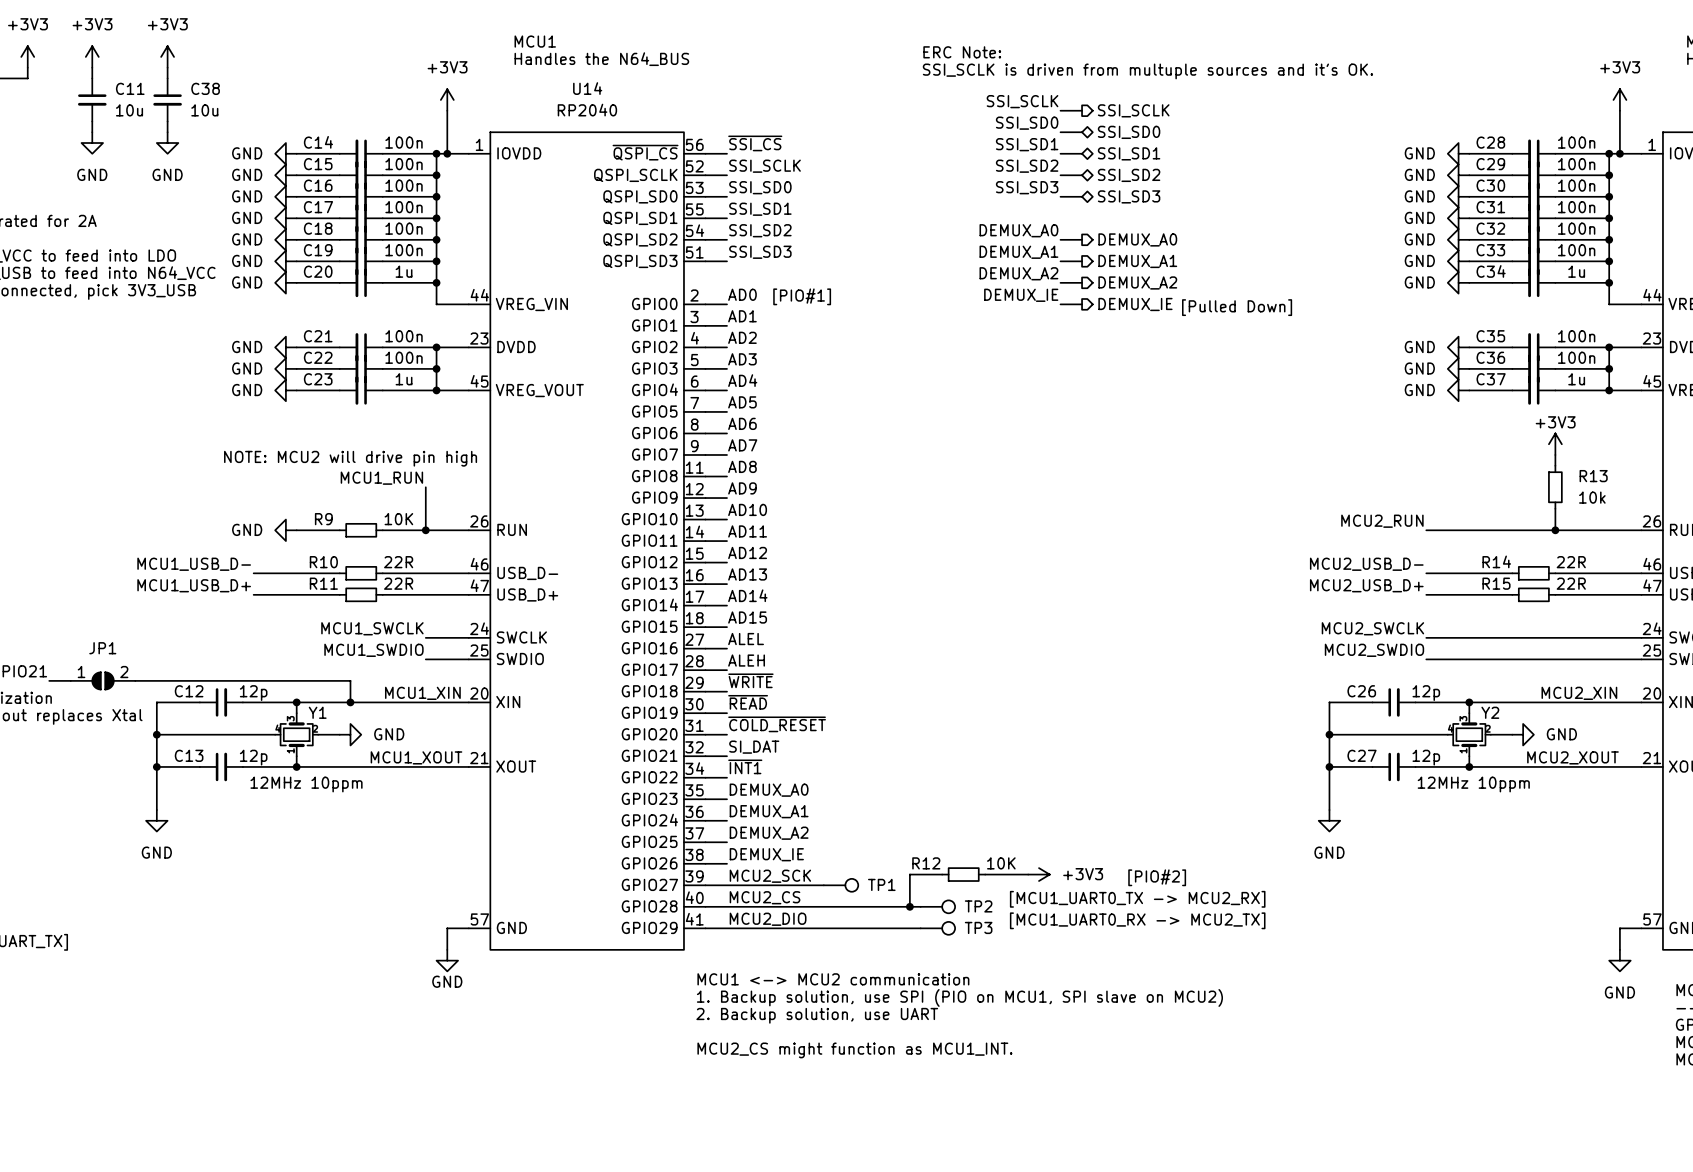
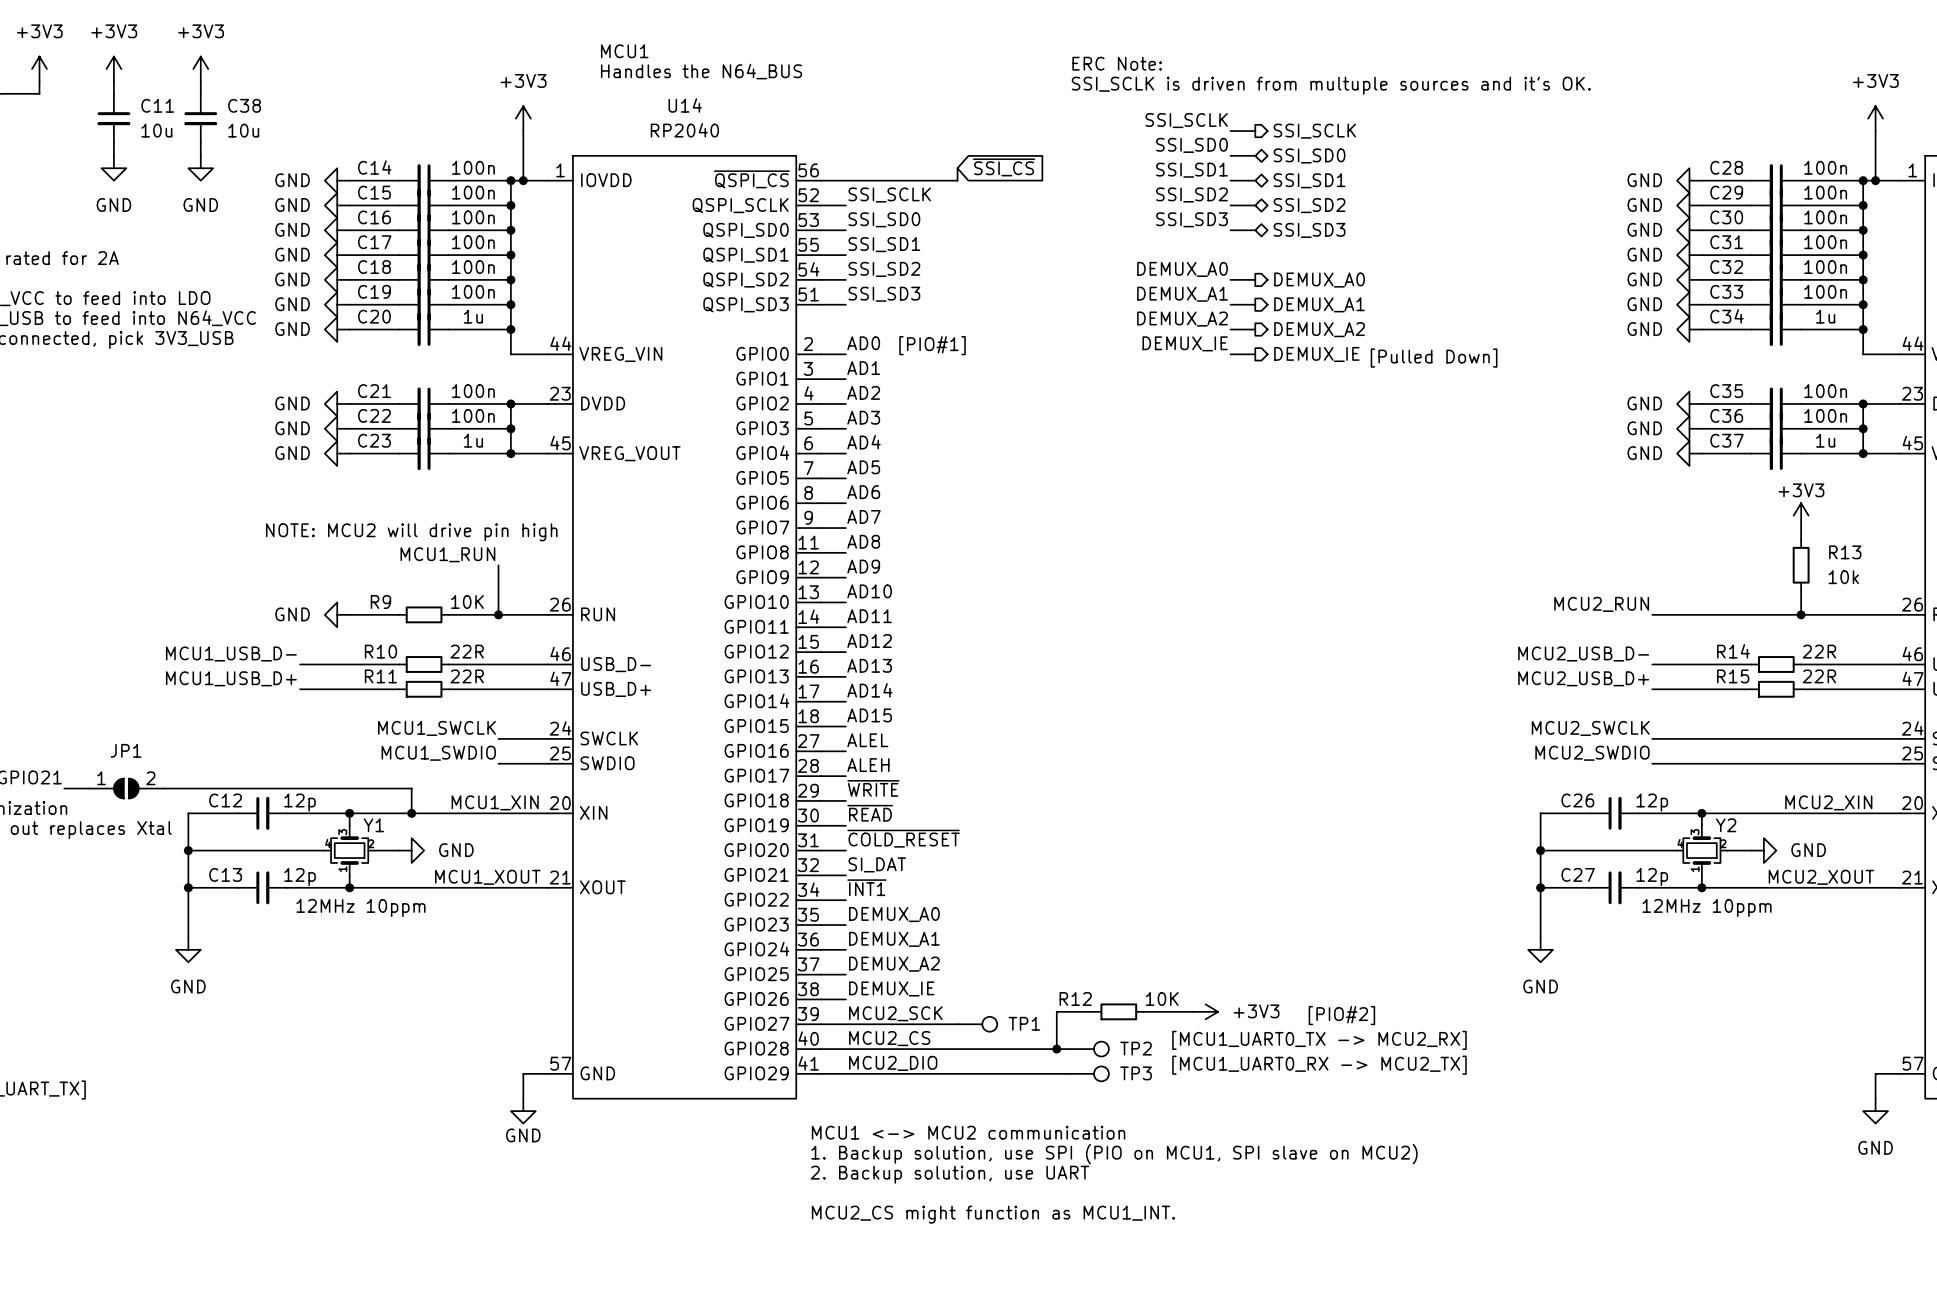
global label: none -> ~{SSI_CS} (1004, 167)
label: ~{SSI_CS} (755, 143) -> none
wire: none -> (957, 168) (957, 180) (845, 180)

